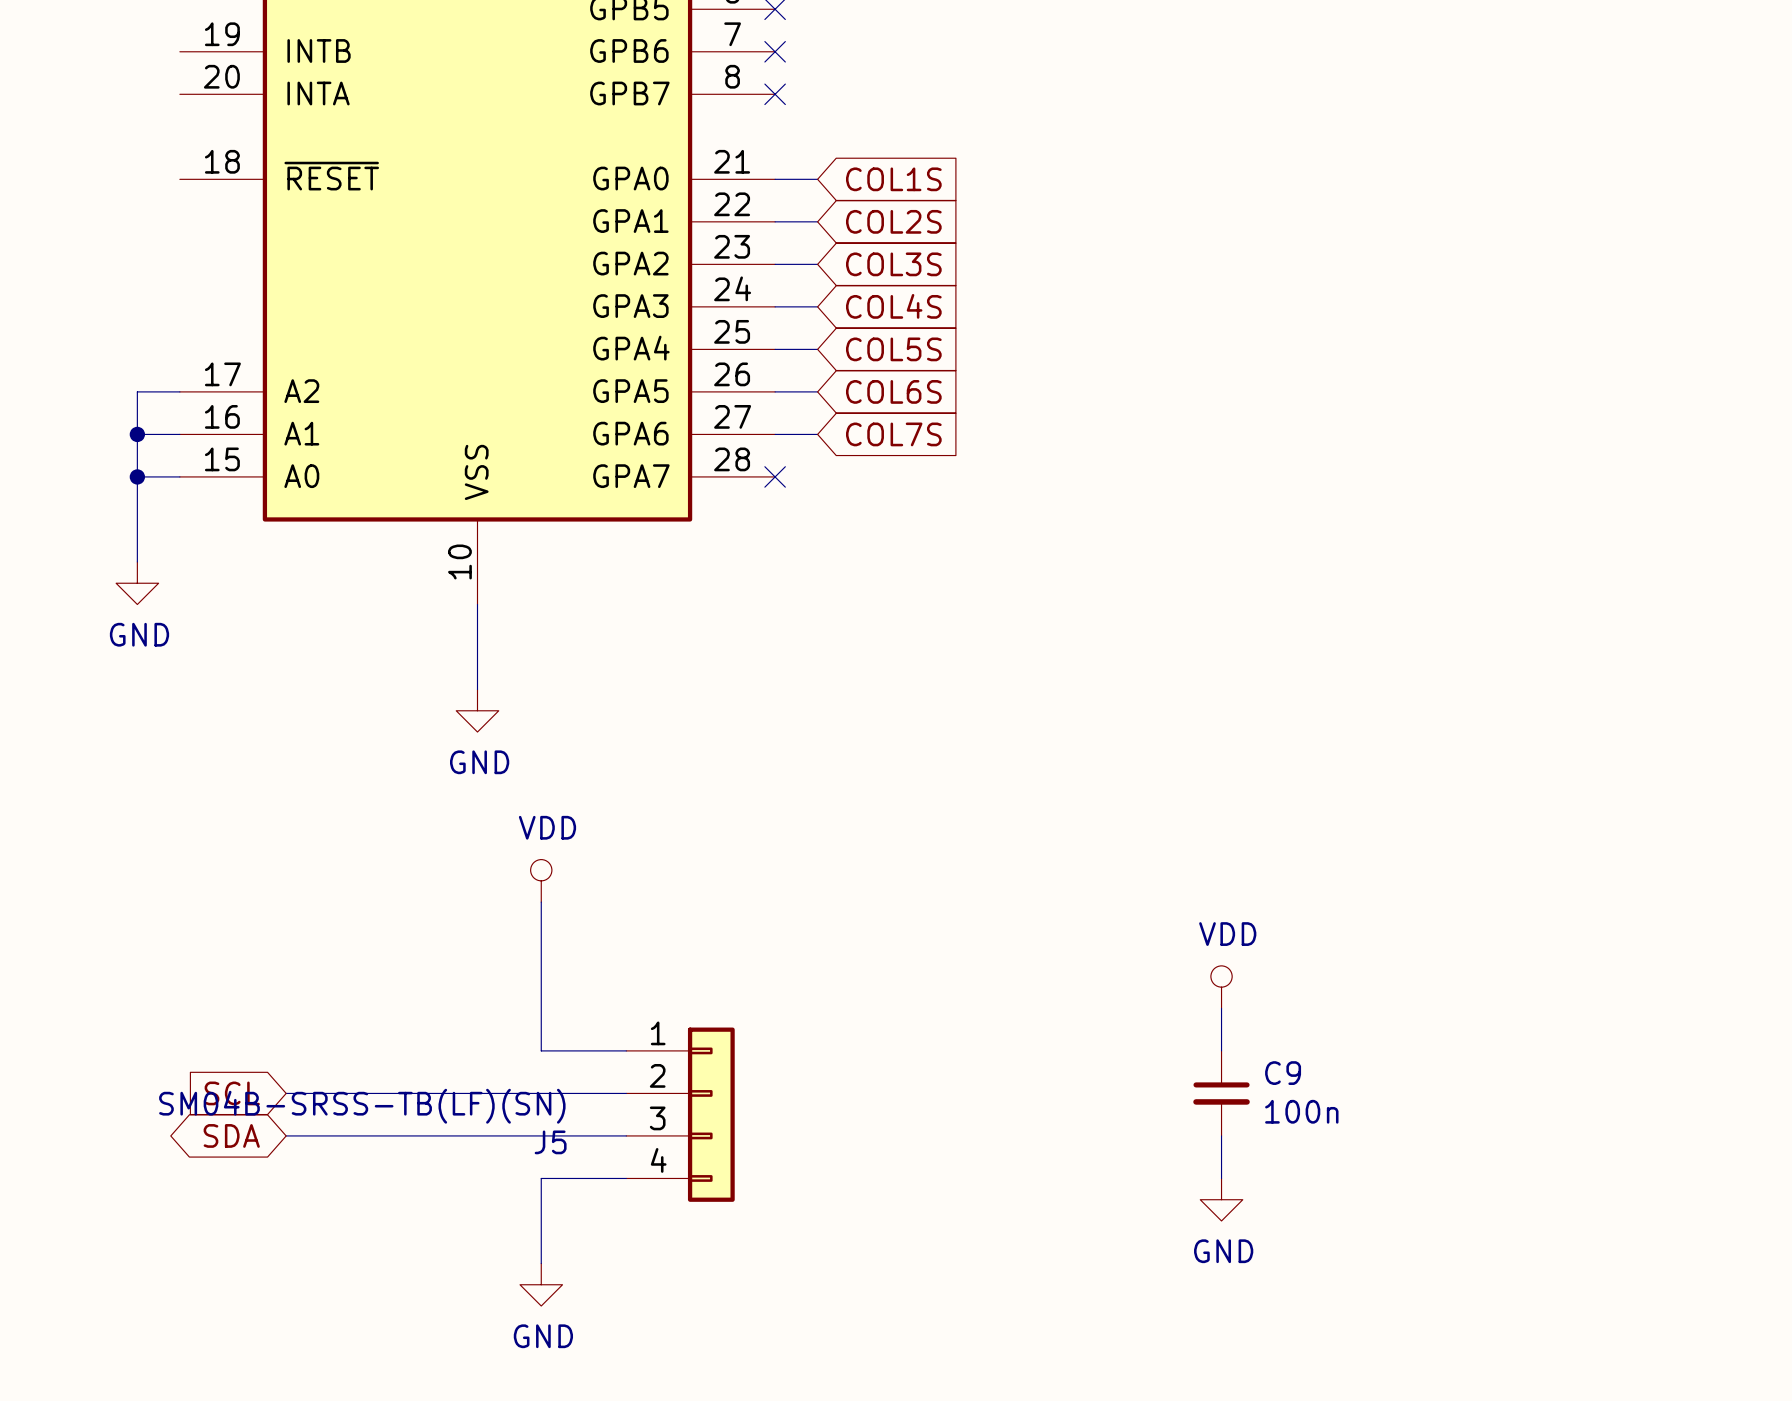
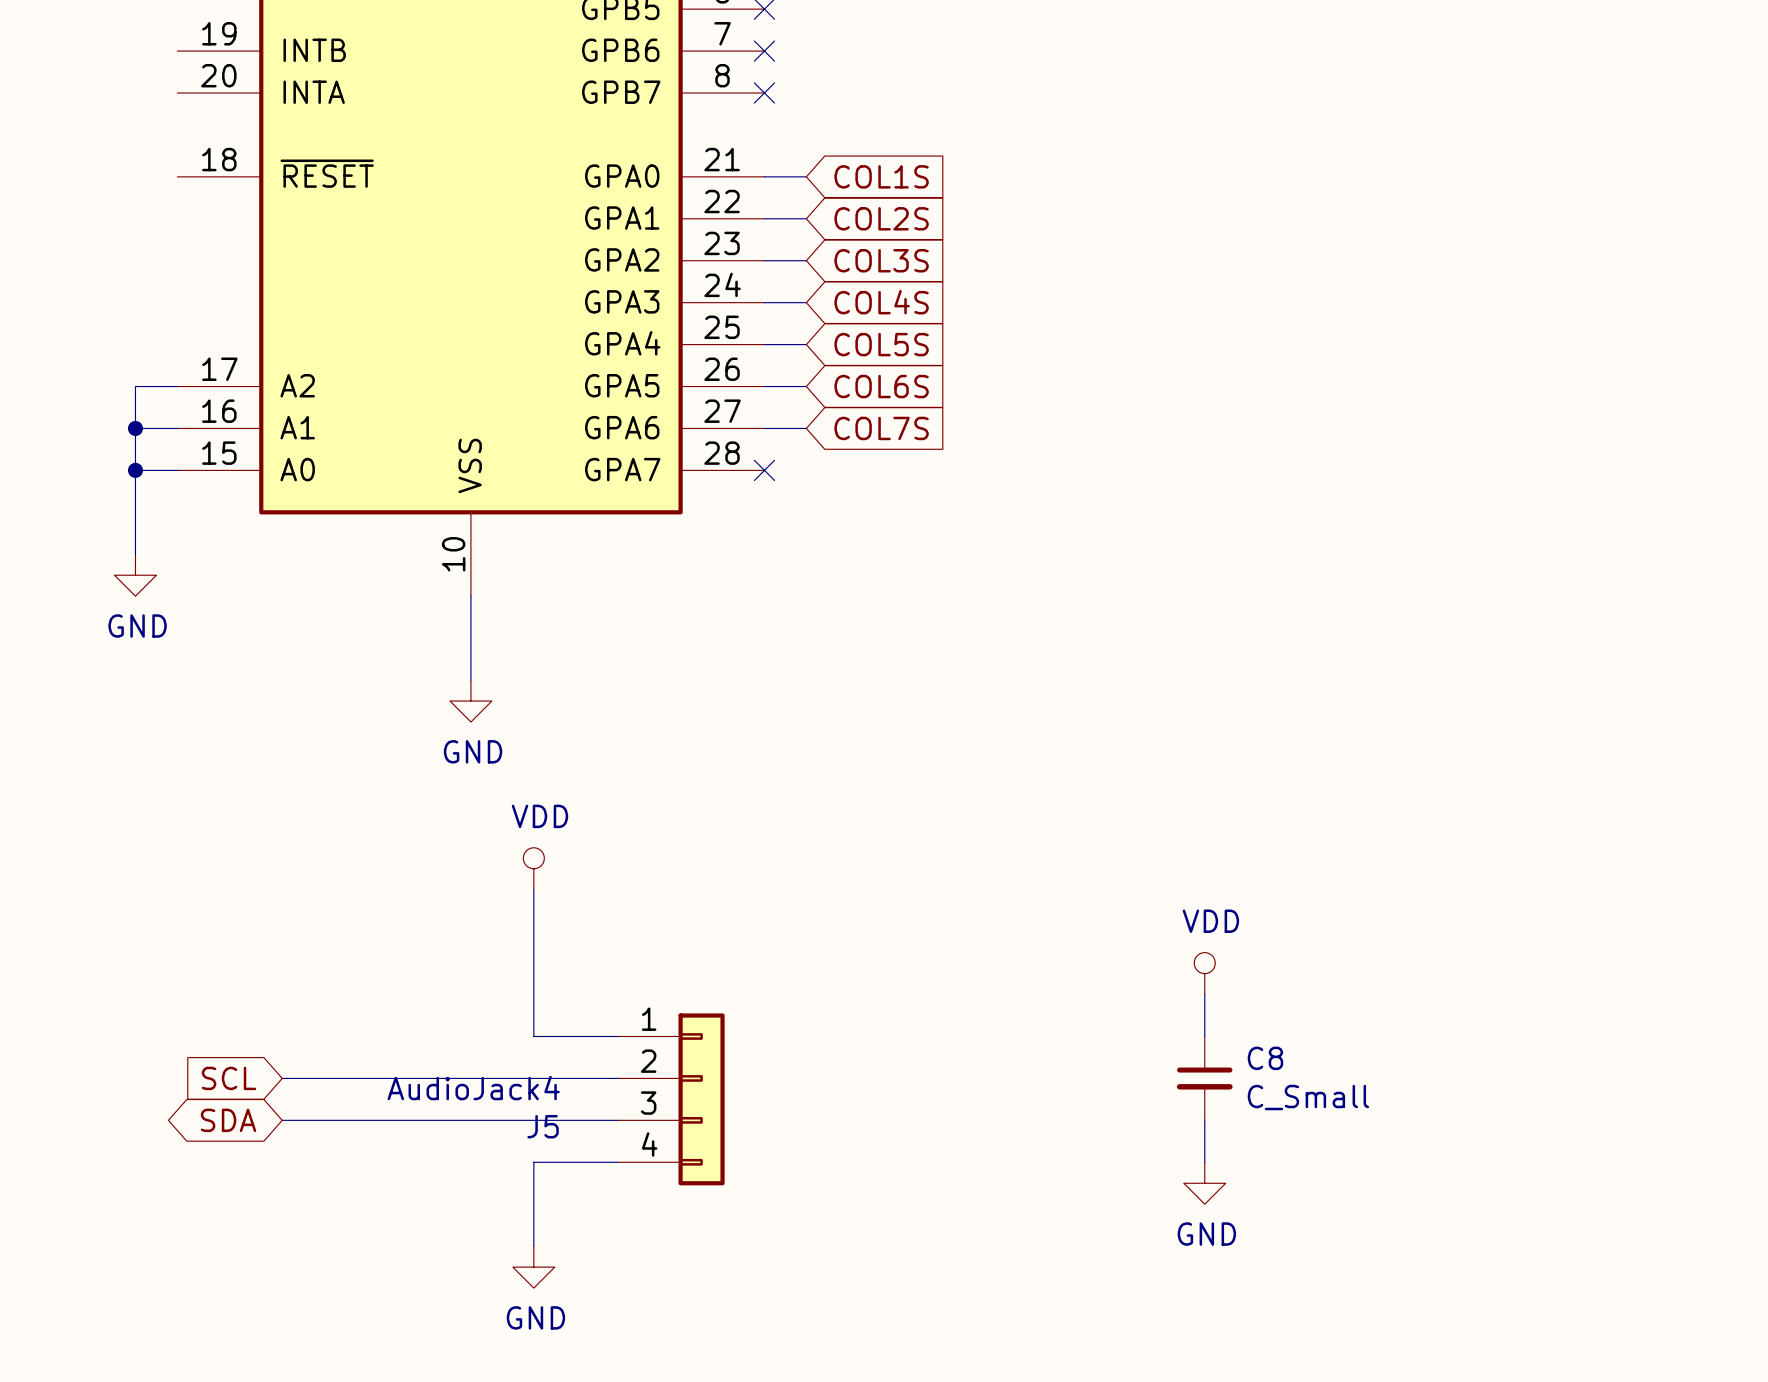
C9 name: C9 (1283, 1073) -> C8 (1265, 1058)
J5 value: SM04B-SRSS-TB(LF)(SN) (362, 1106) -> AudioJack4 (473, 1088)
C9 value: 100n (1301, 1111) -> C_Small (1308, 1097)

